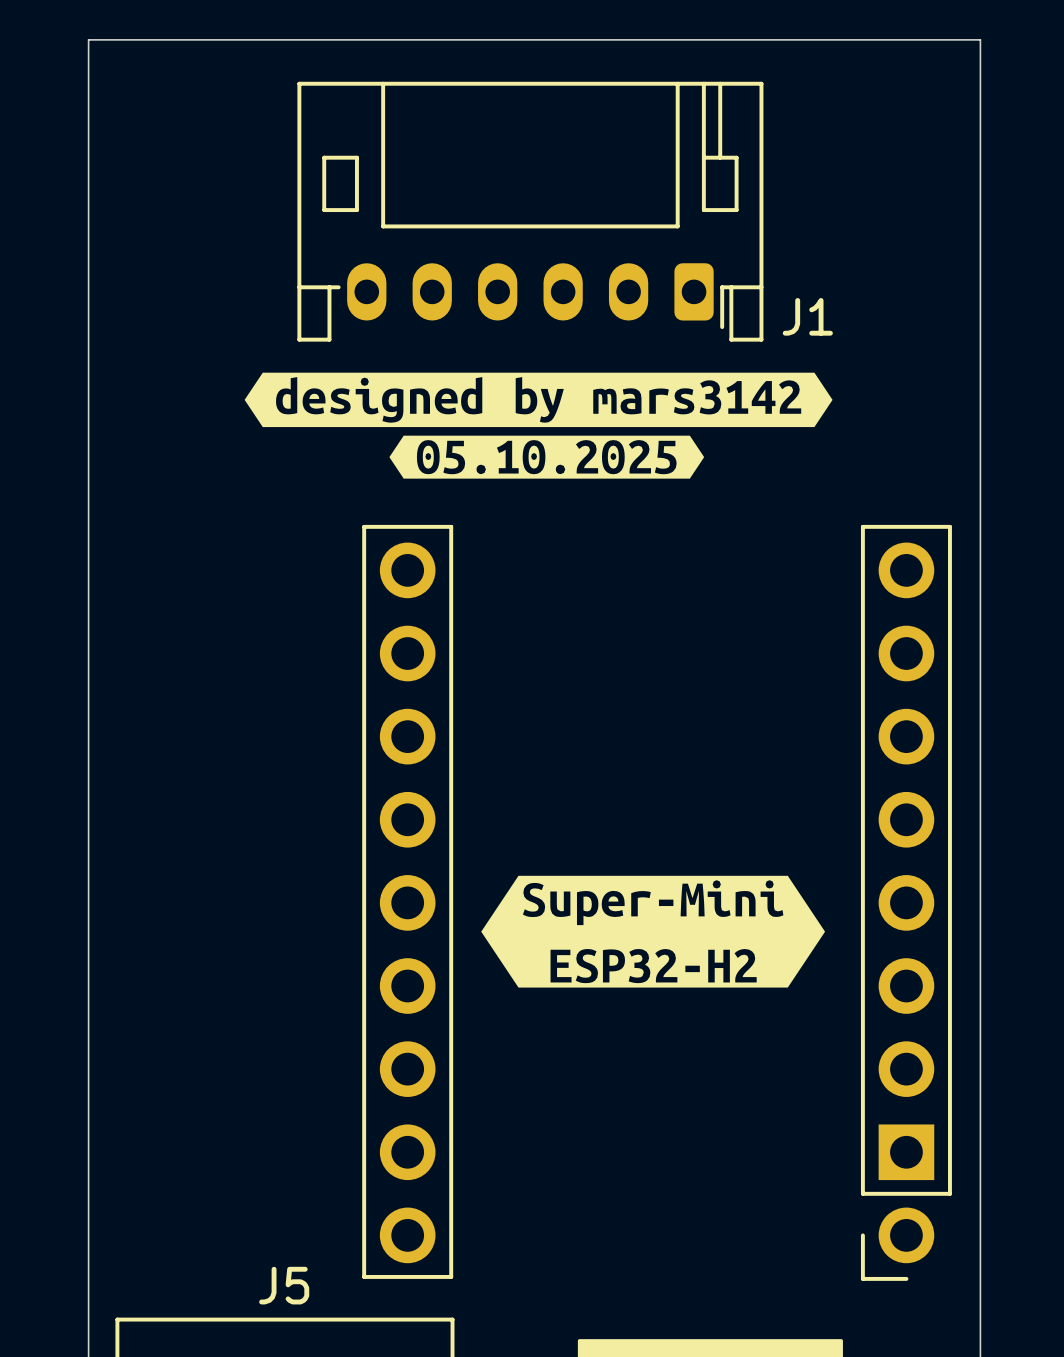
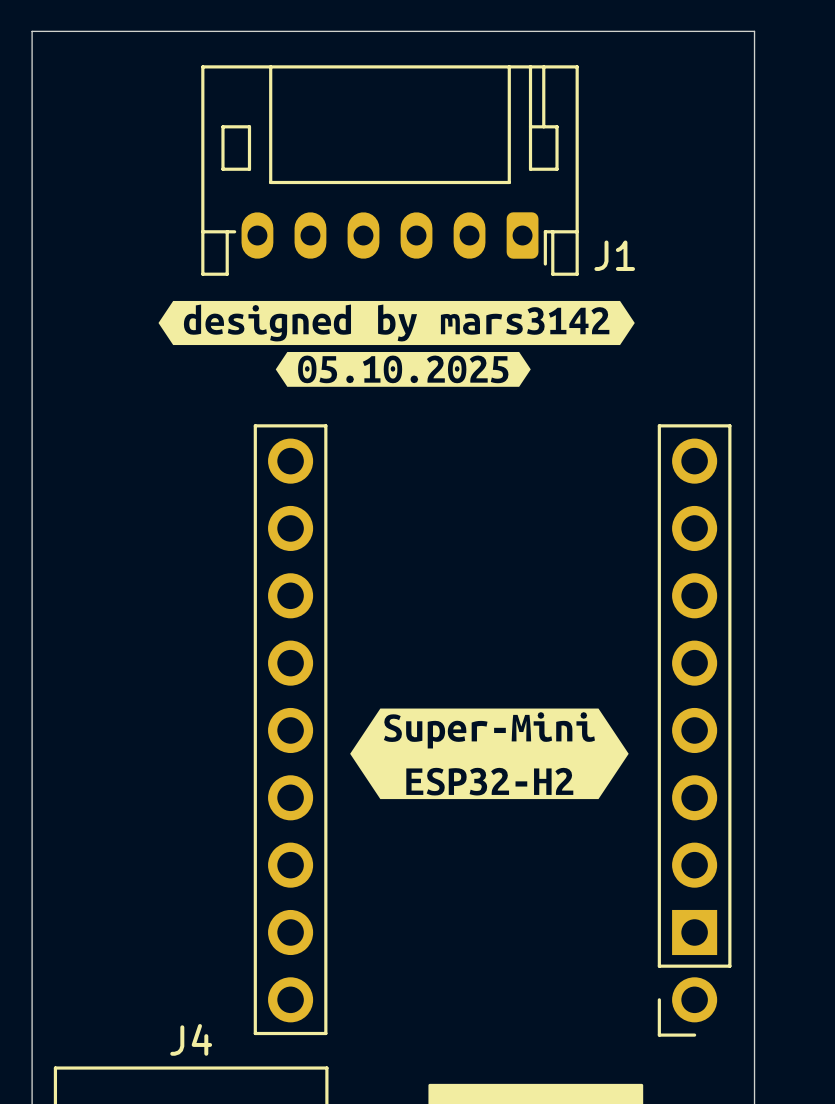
J5 name: J5 (284, 1285) -> J4 (191, 1039)

